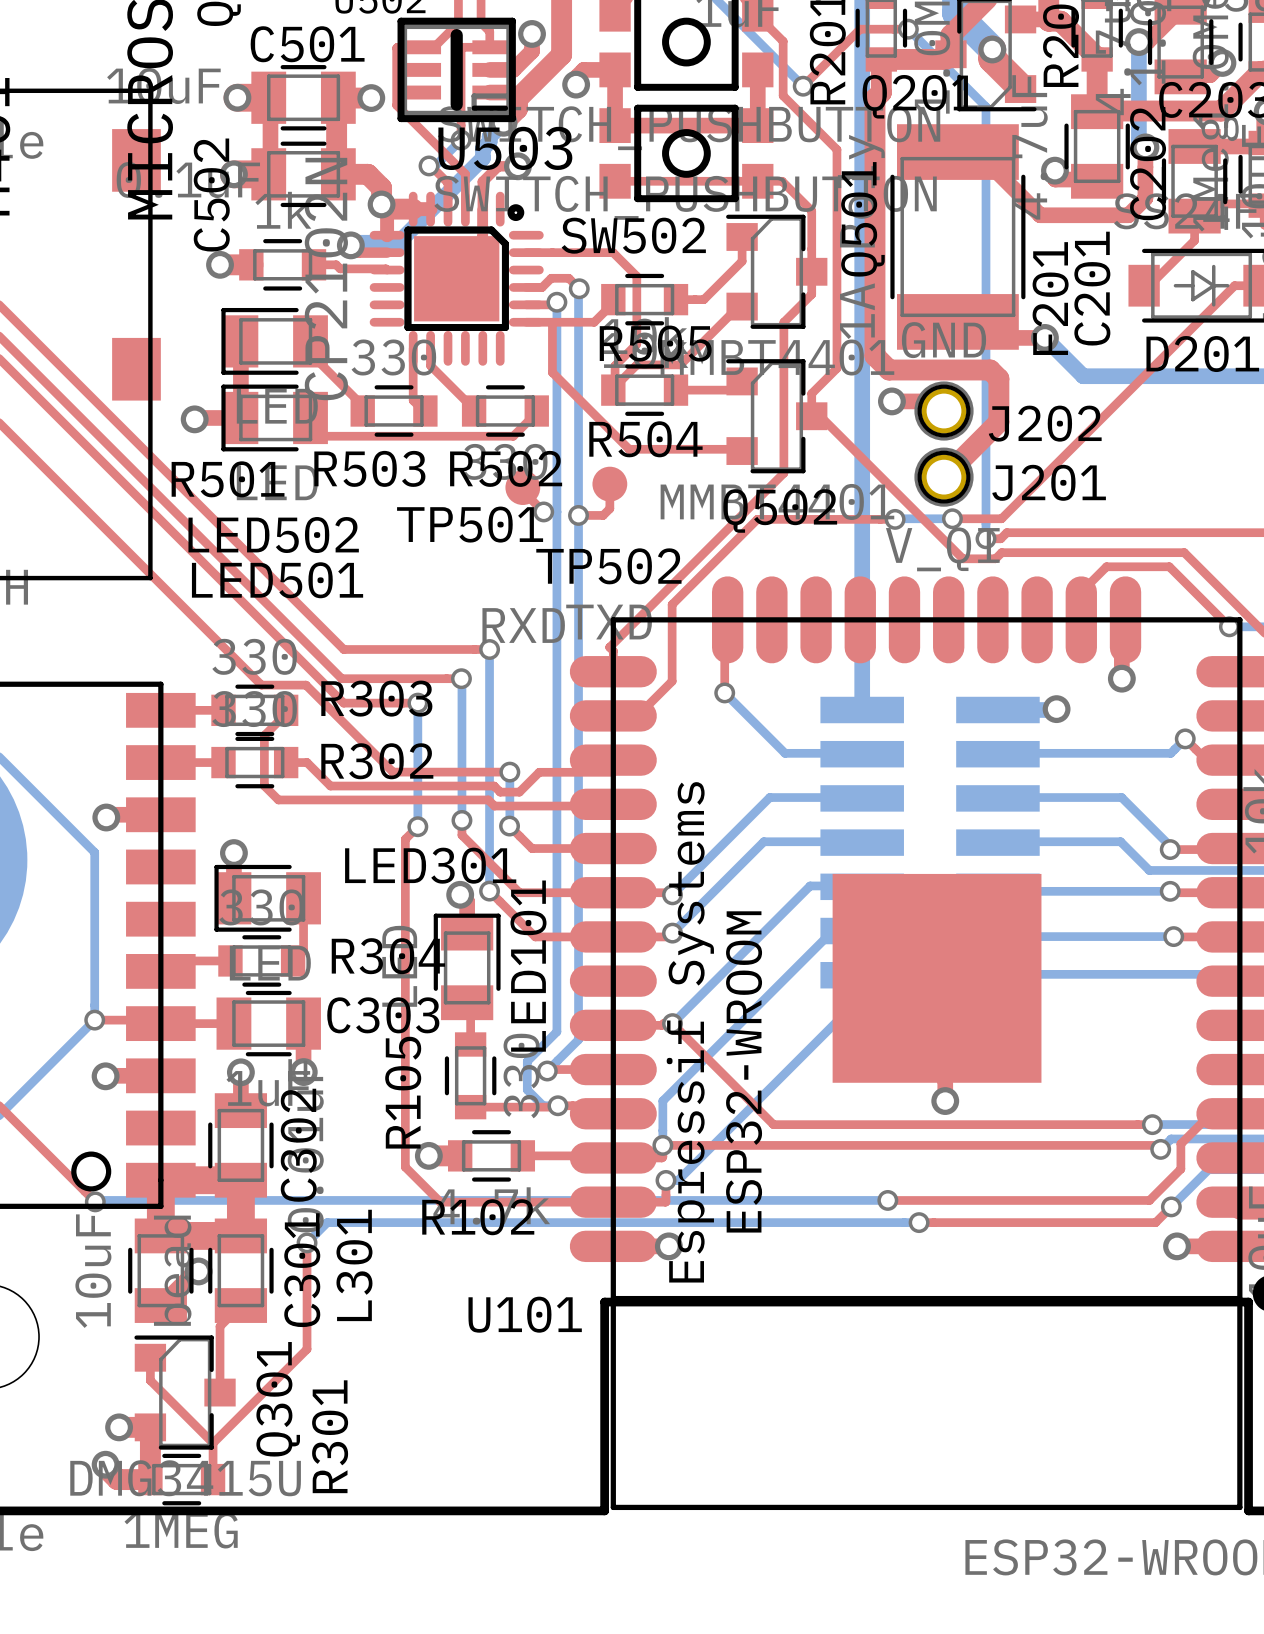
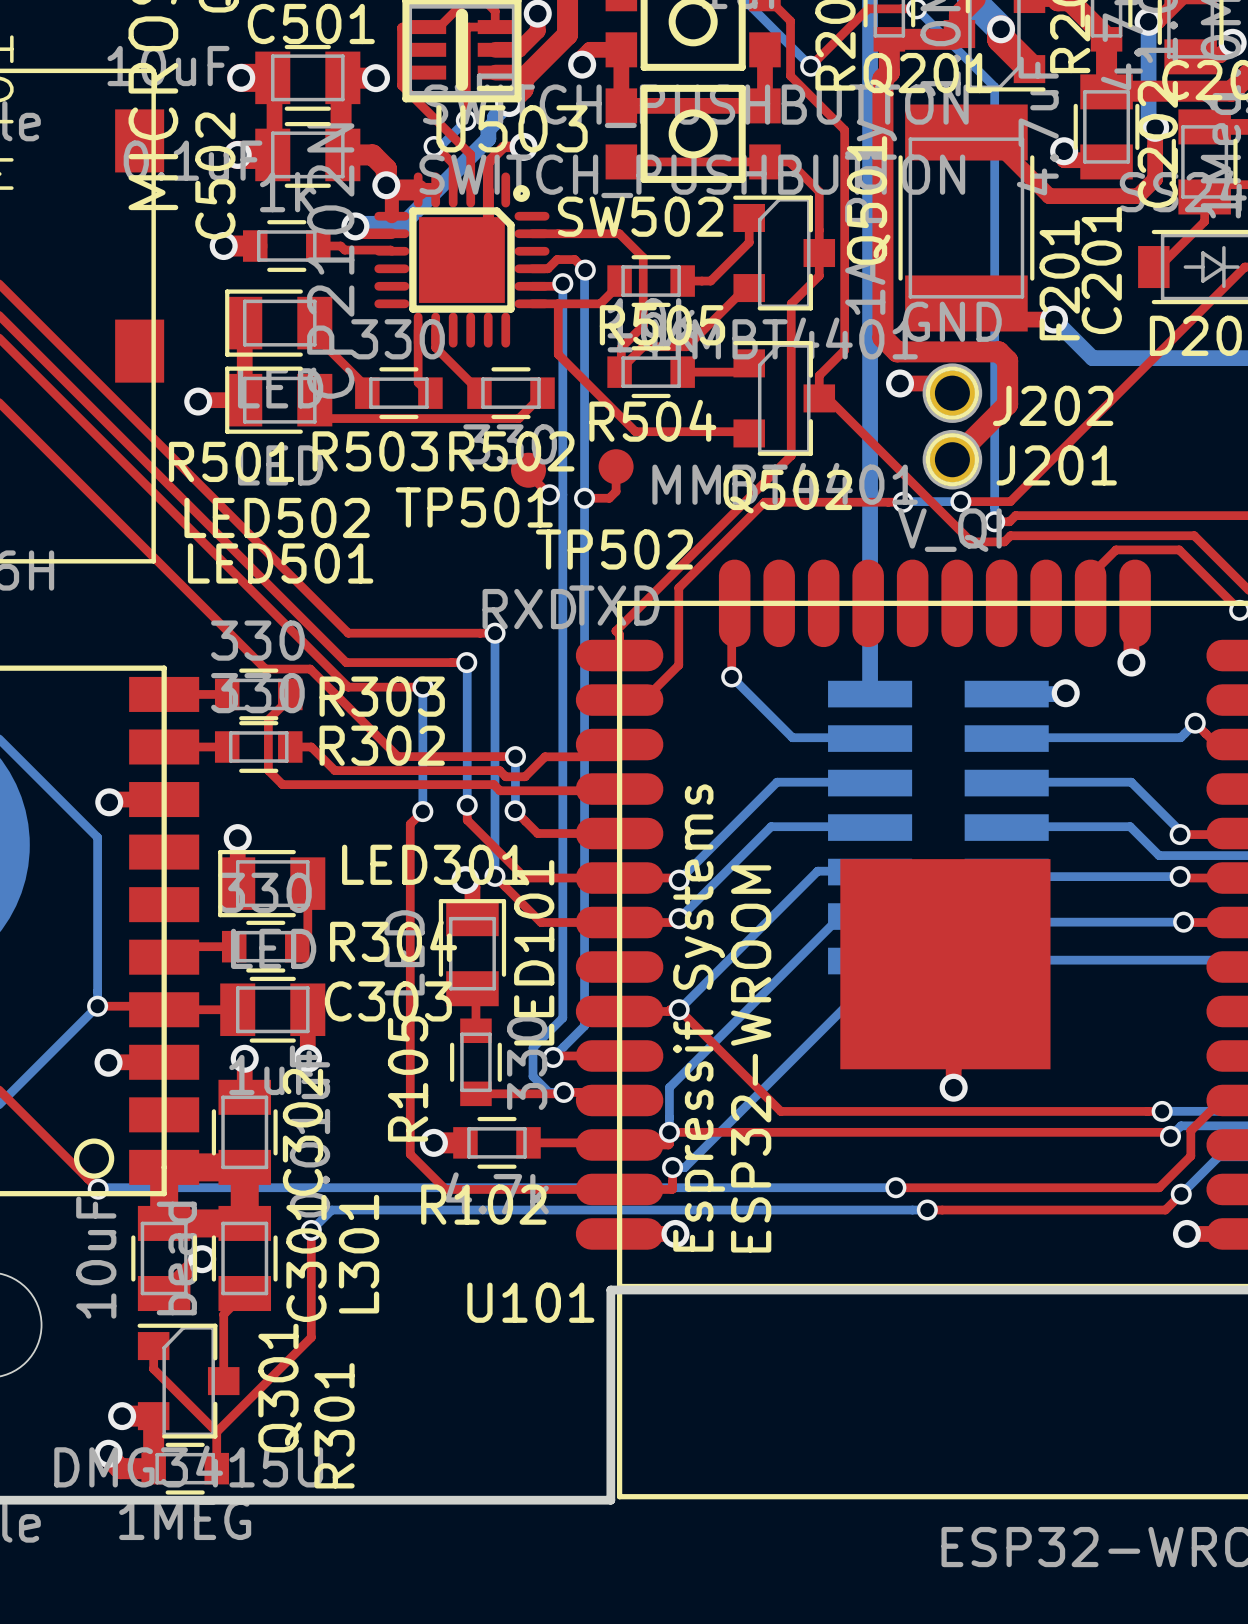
R303 name position: R303 (376, 698) -> R303 (382, 696)
LED301 name position: LED301 (430, 865) -> LED301 (434, 864)

